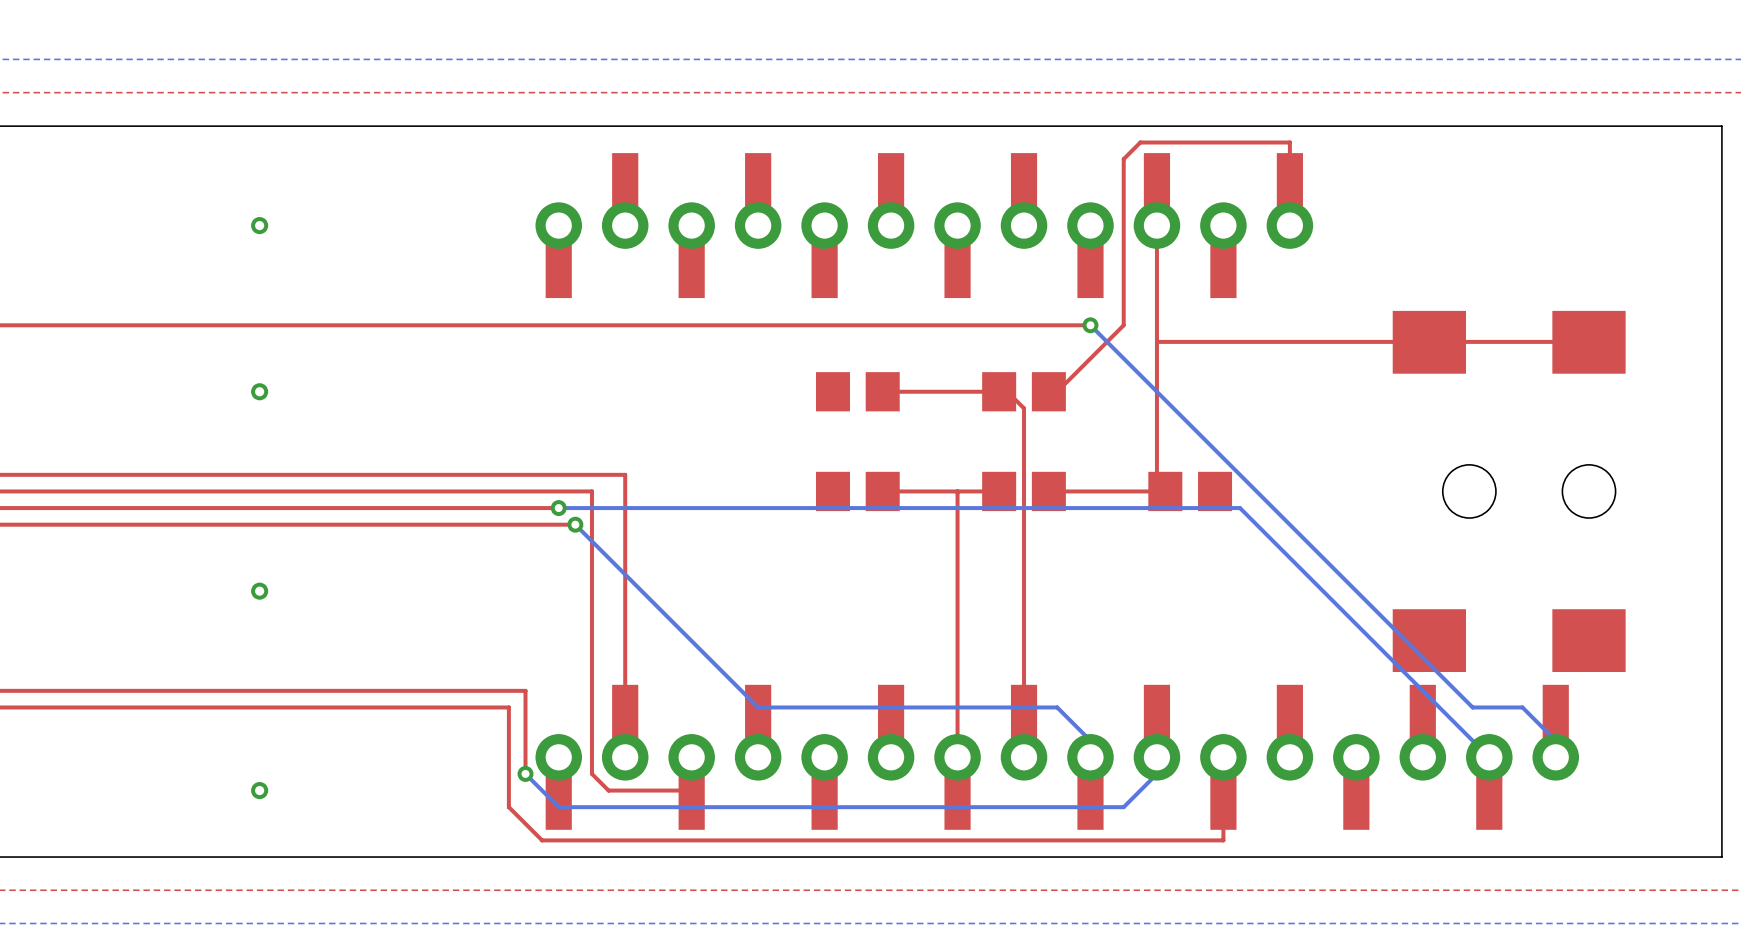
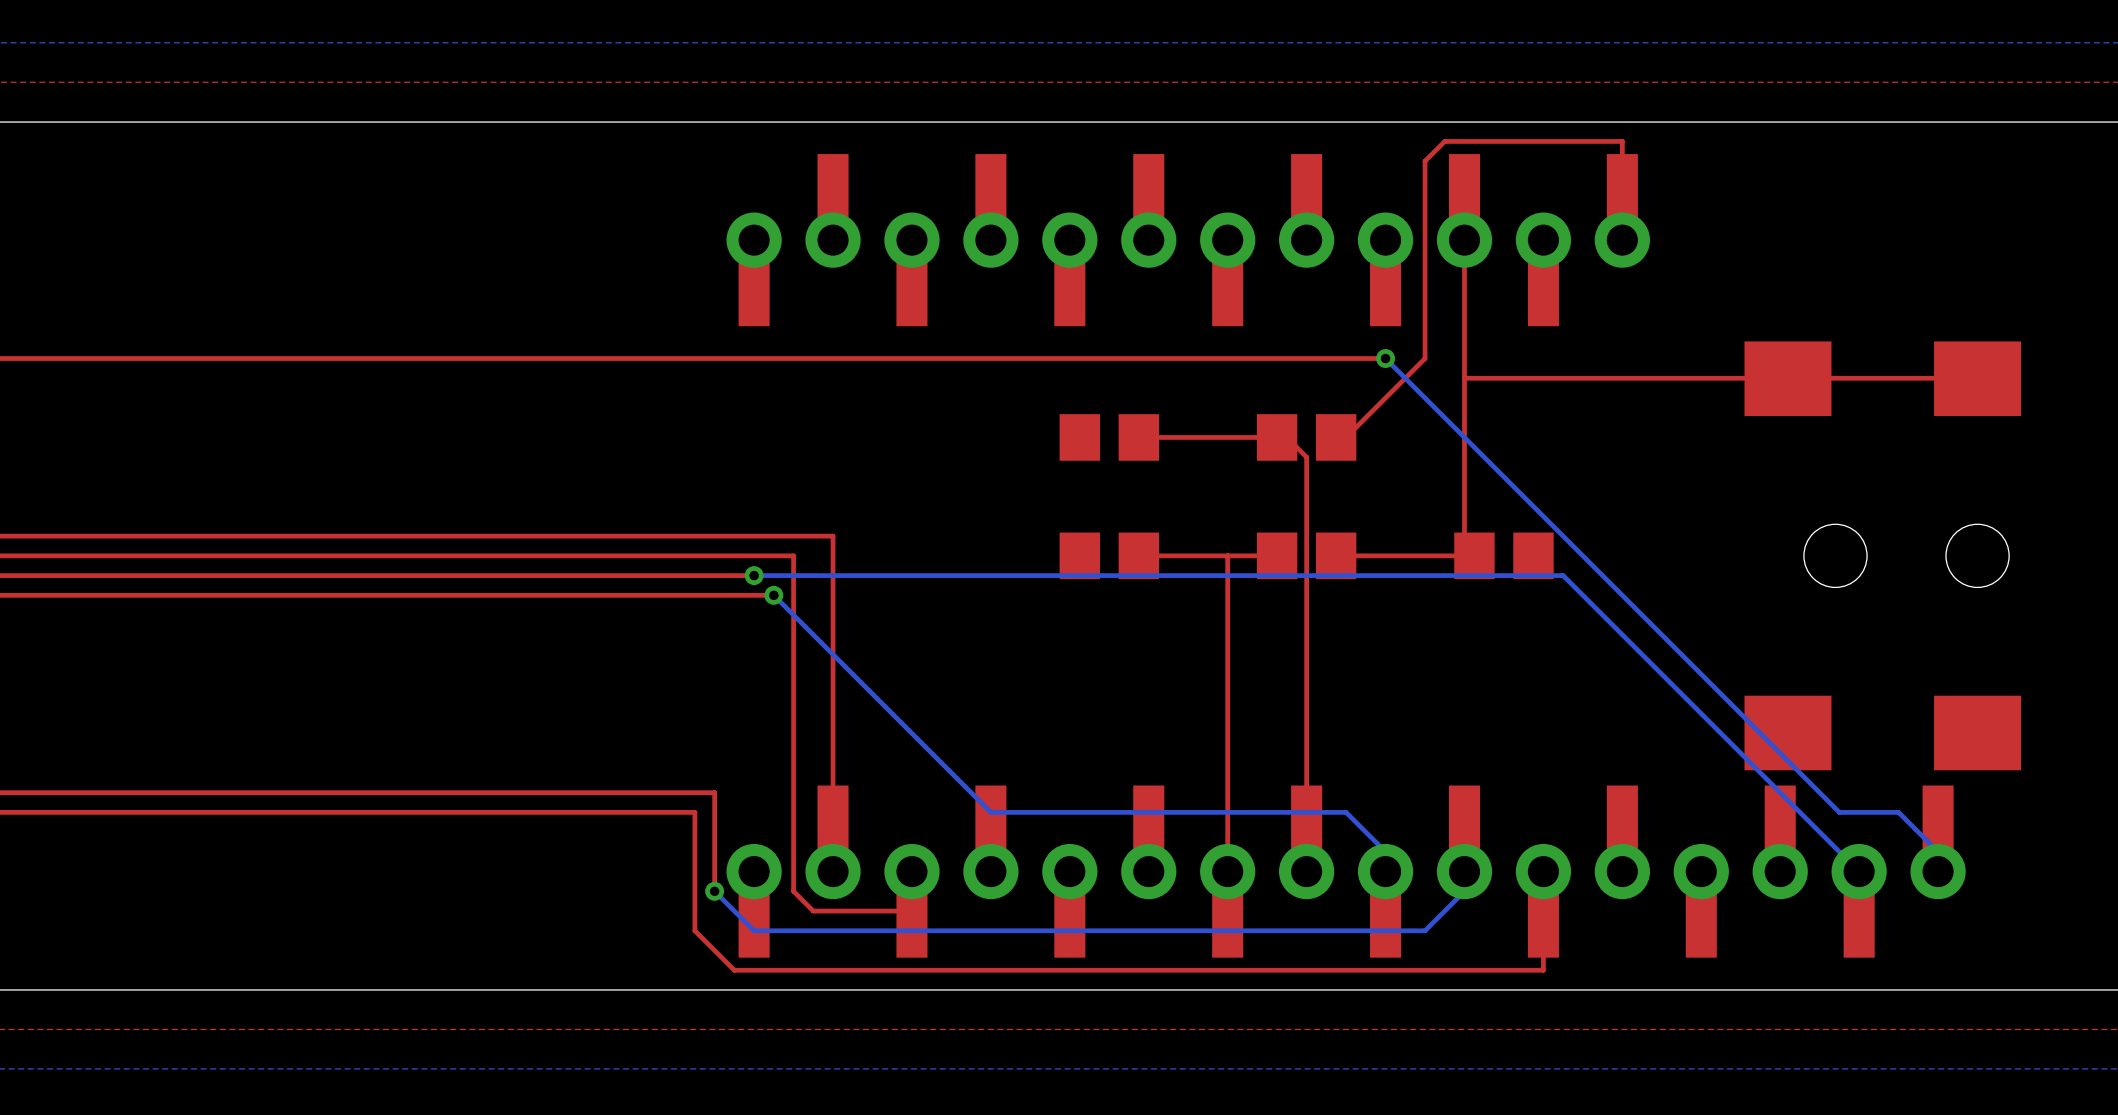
via: (259, 225) -> none
via: (259, 391) -> none
via: (259, 591) -> none
via: (259, 790) -> none

